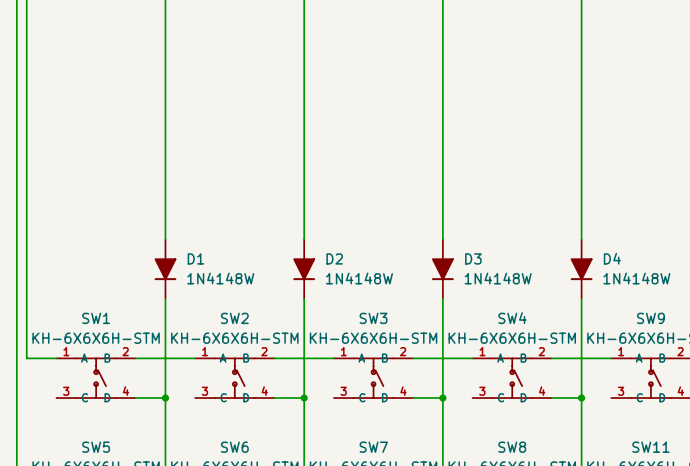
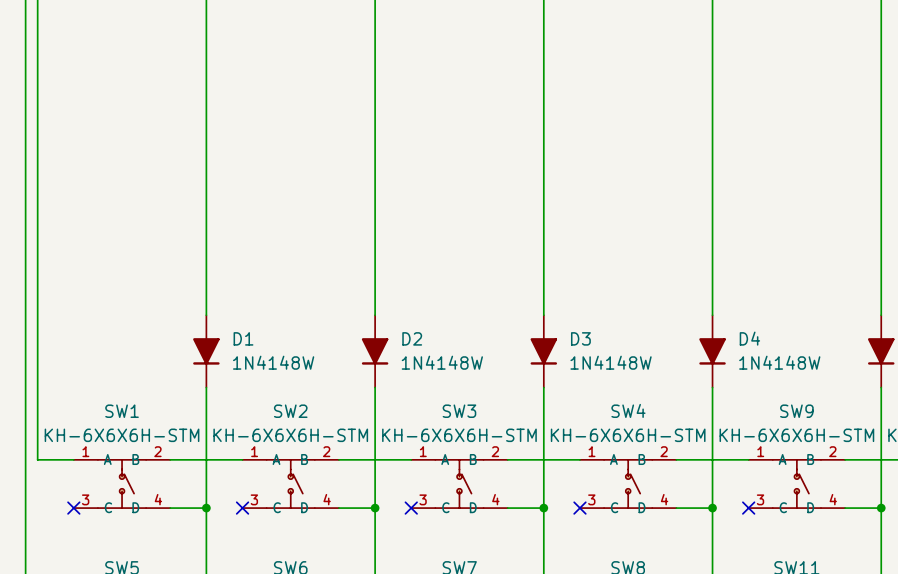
no-connect mark: none -> (73, 508)
no-connect mark: none -> (242, 508)
no-connect mark: none -> (411, 508)
no-connect mark: none -> (579, 508)
no-connect mark: none -> (748, 508)

